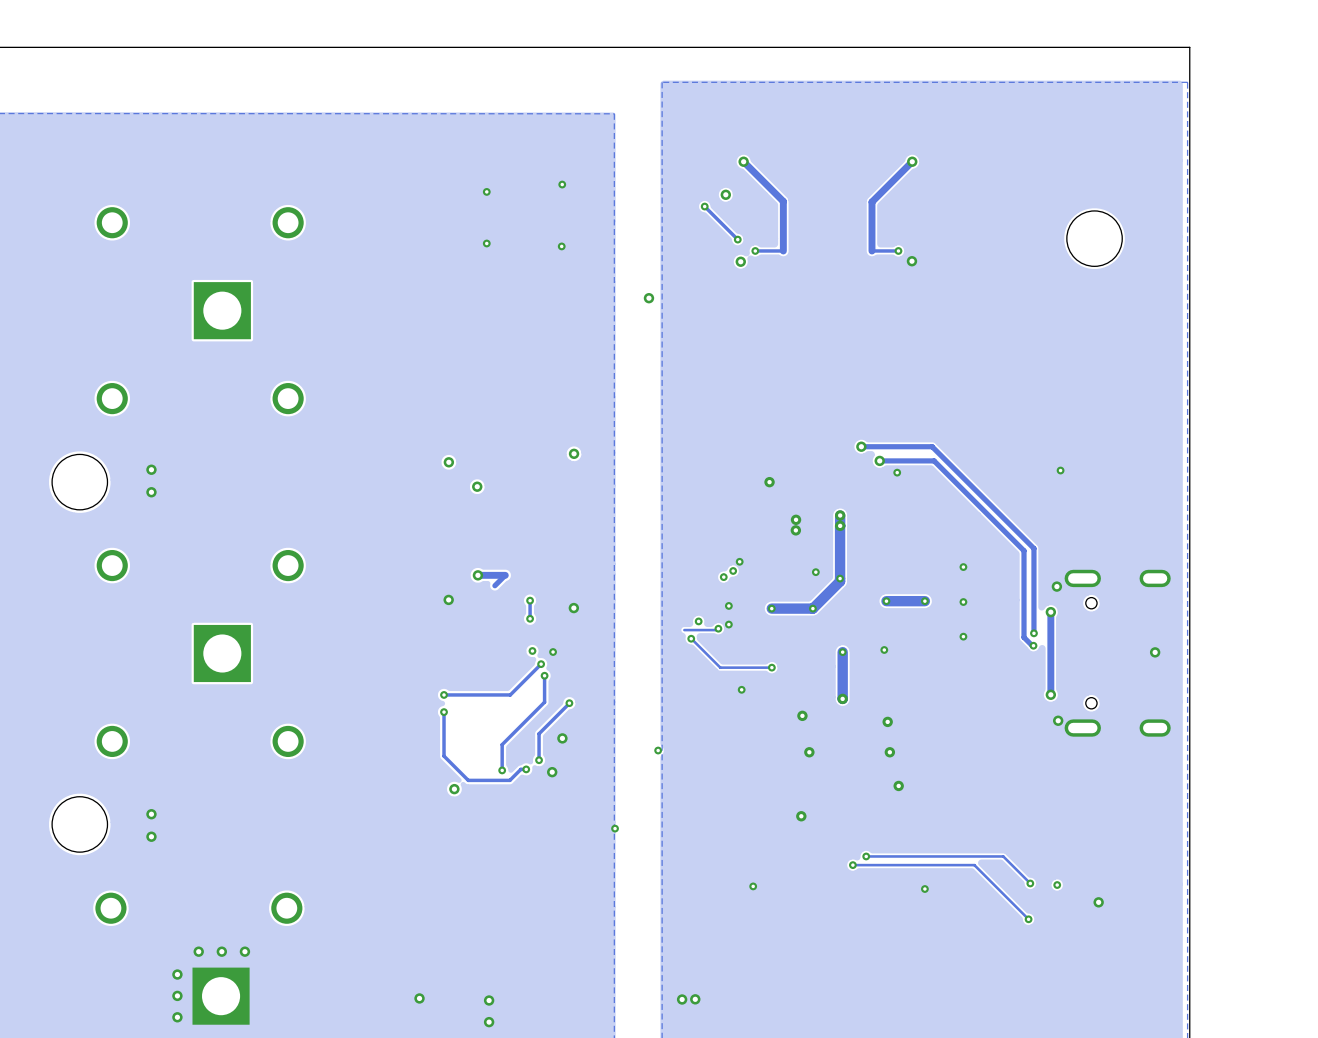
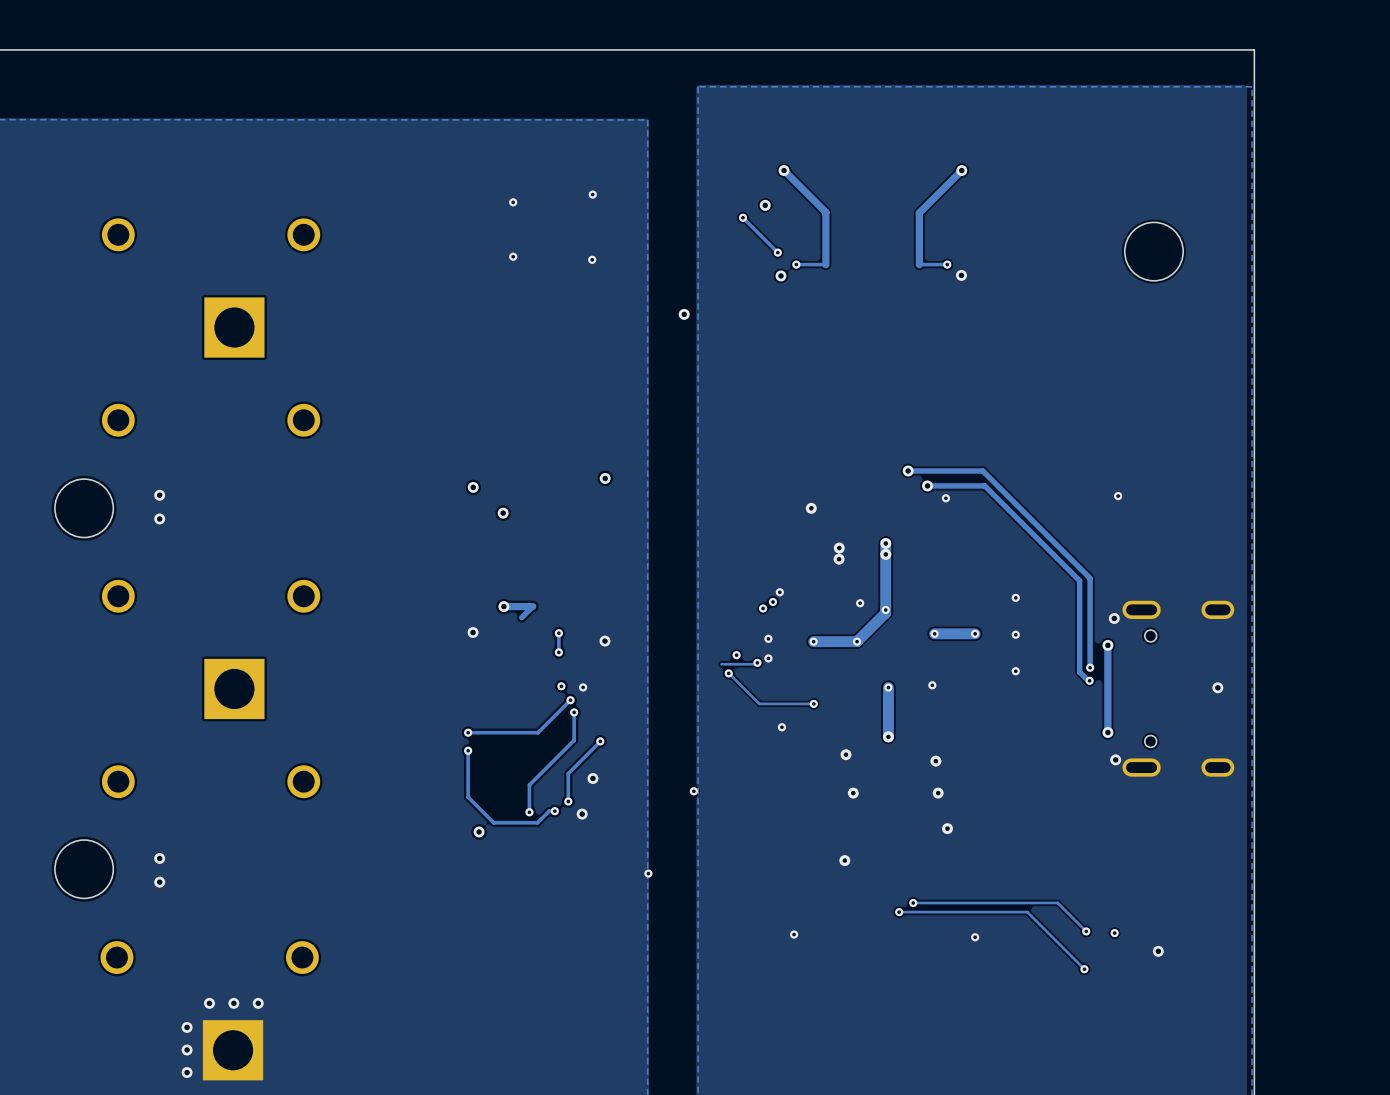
via: (419, 998) -> none
via: (682, 999) -> none
via: (695, 999) -> none
via: (489, 1000) -> none
via: (489, 1022) -> none

